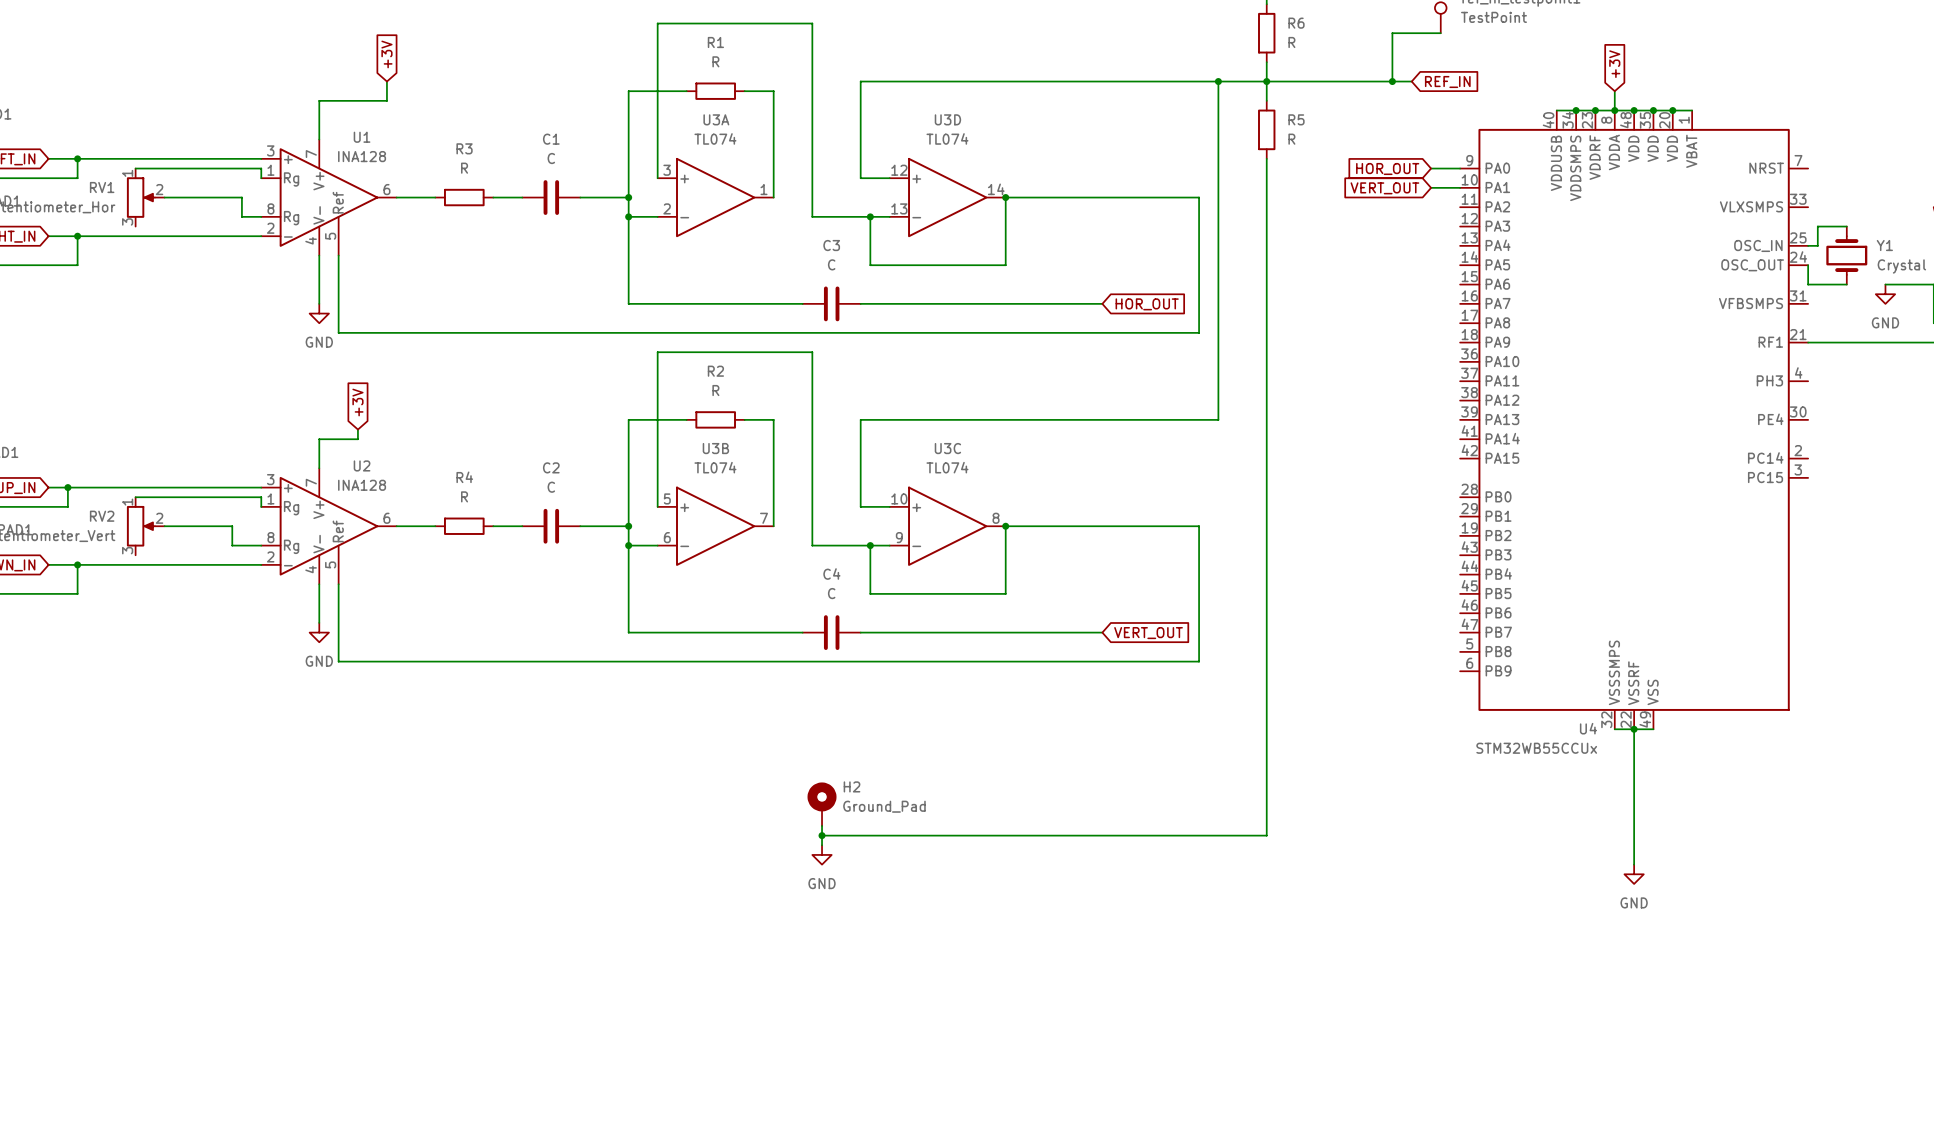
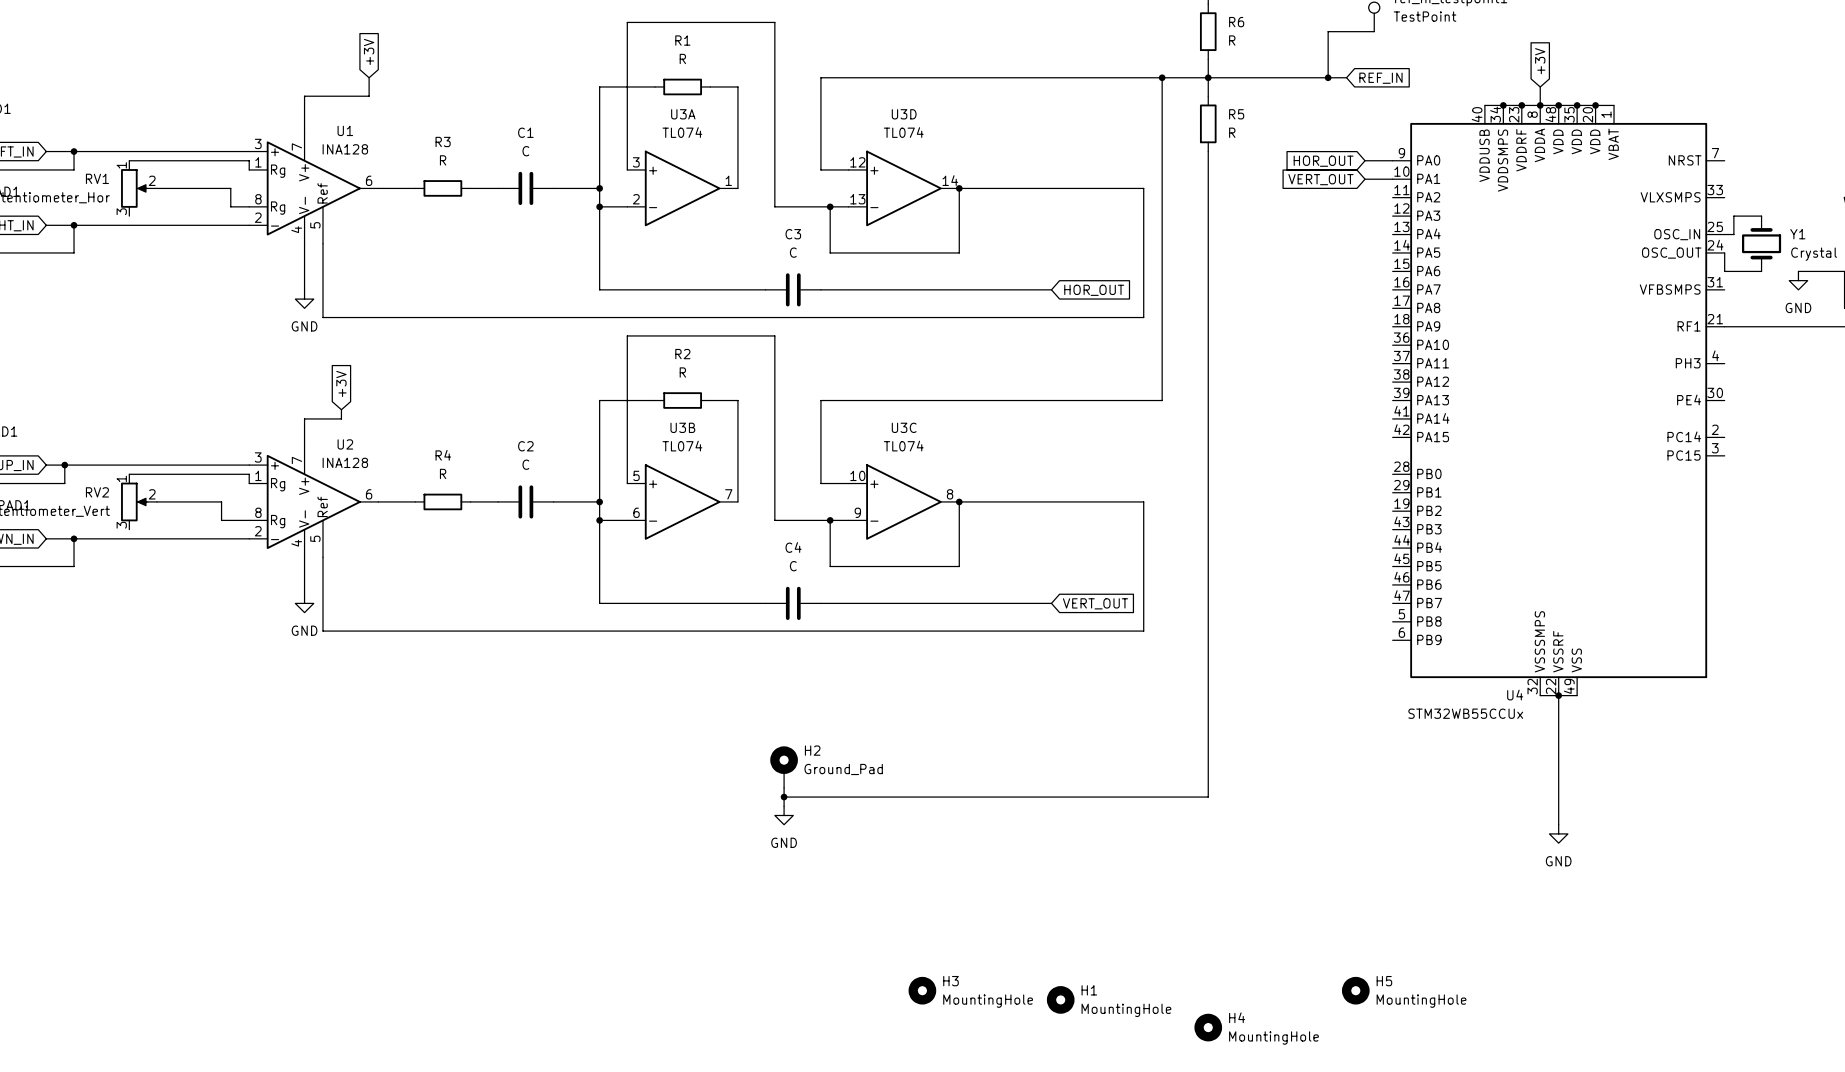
H3: none -> MountingHole (922, 990)
H5: none -> MountingHole (1355, 990)
H1: none -> MountingHole (1060, 999)
H4: none -> MountingHole (1208, 1027)

